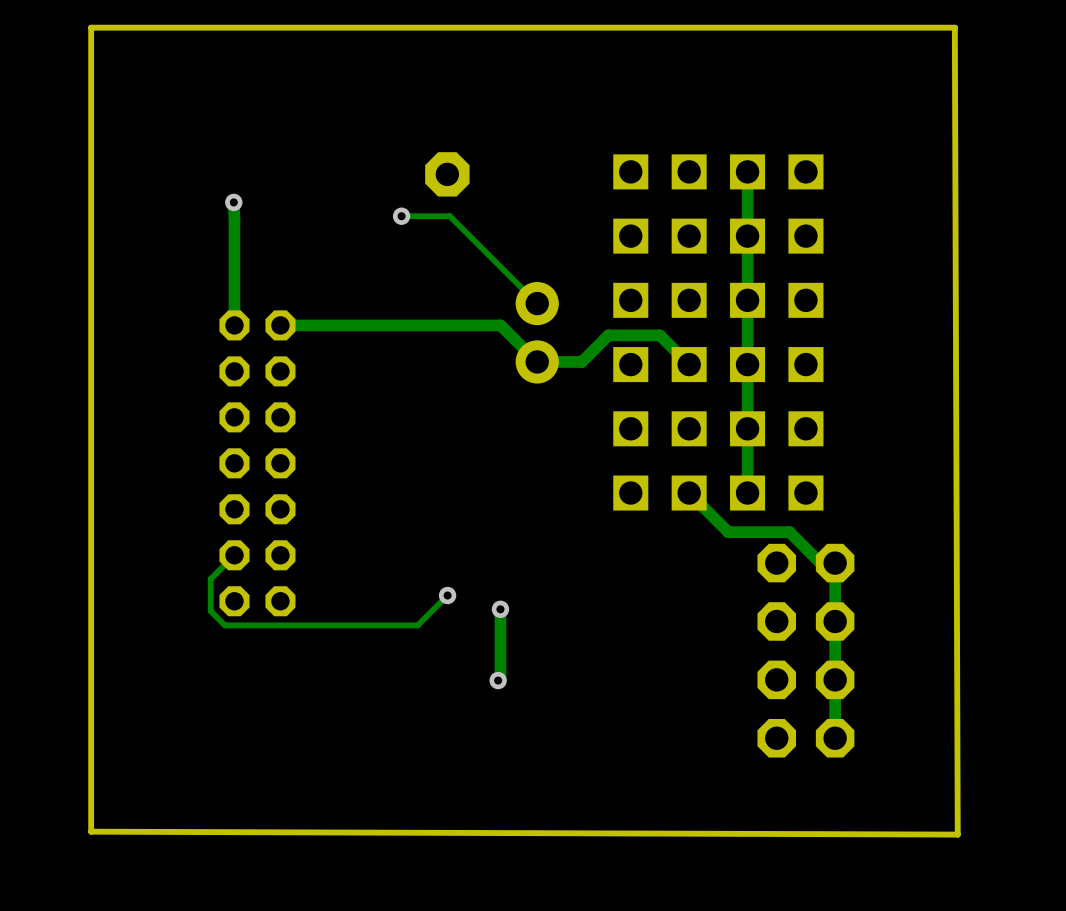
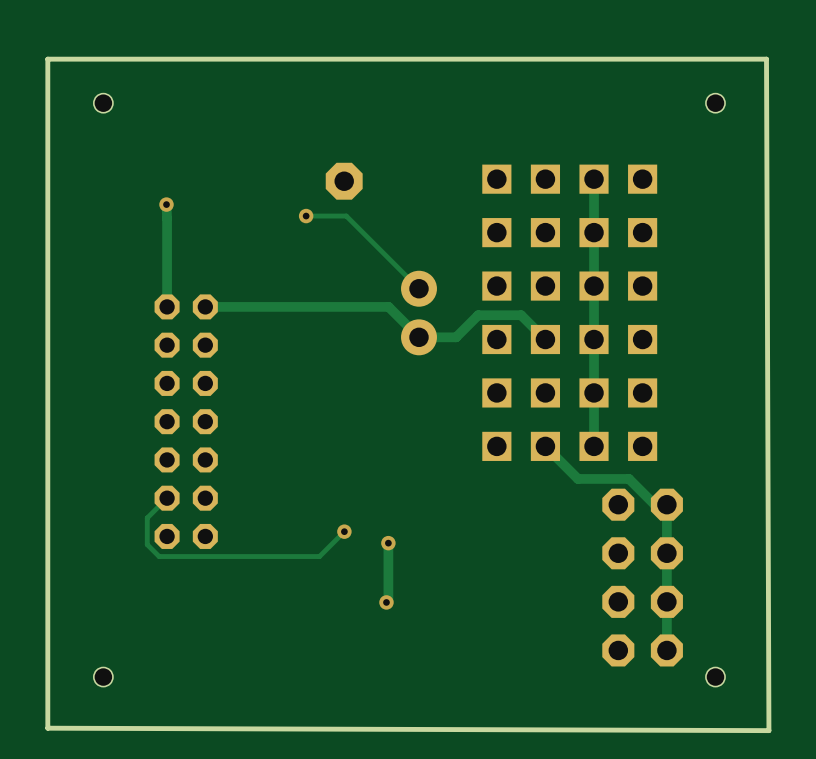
hole: none -> (103, 103)
hole: none -> (715, 103)
hole: none -> (103, 677)
hole: none -> (715, 677)

